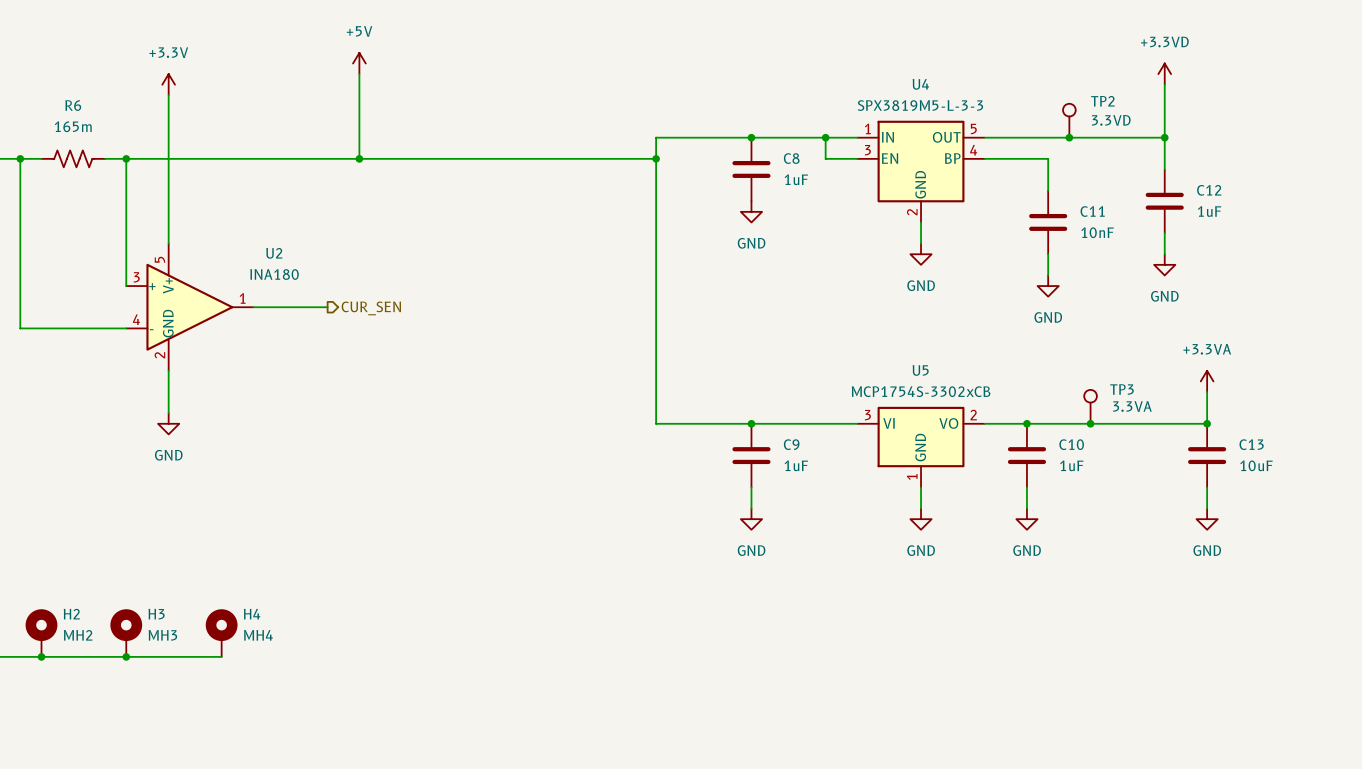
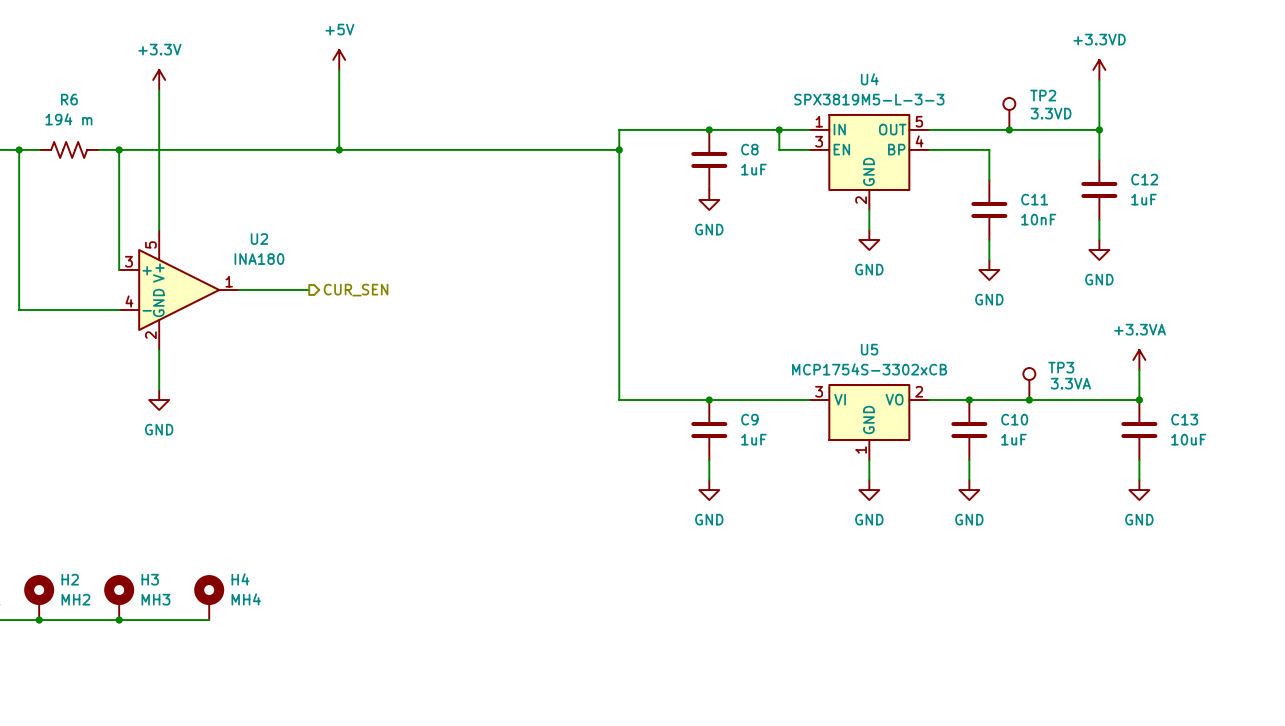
R6 value: 165m (73, 126) -> 194 m (68, 119)

